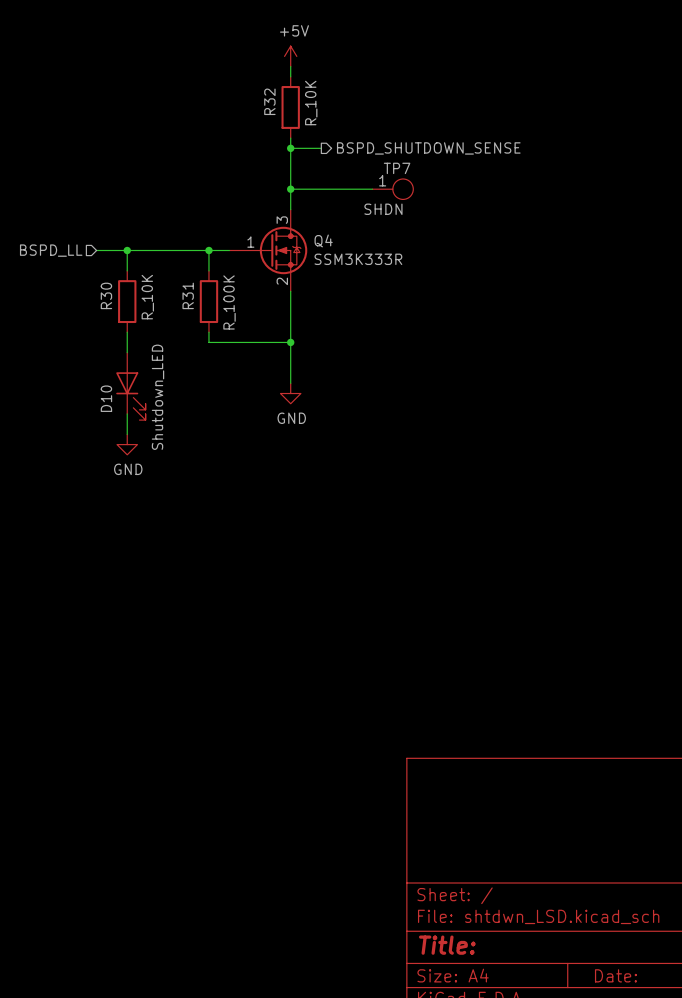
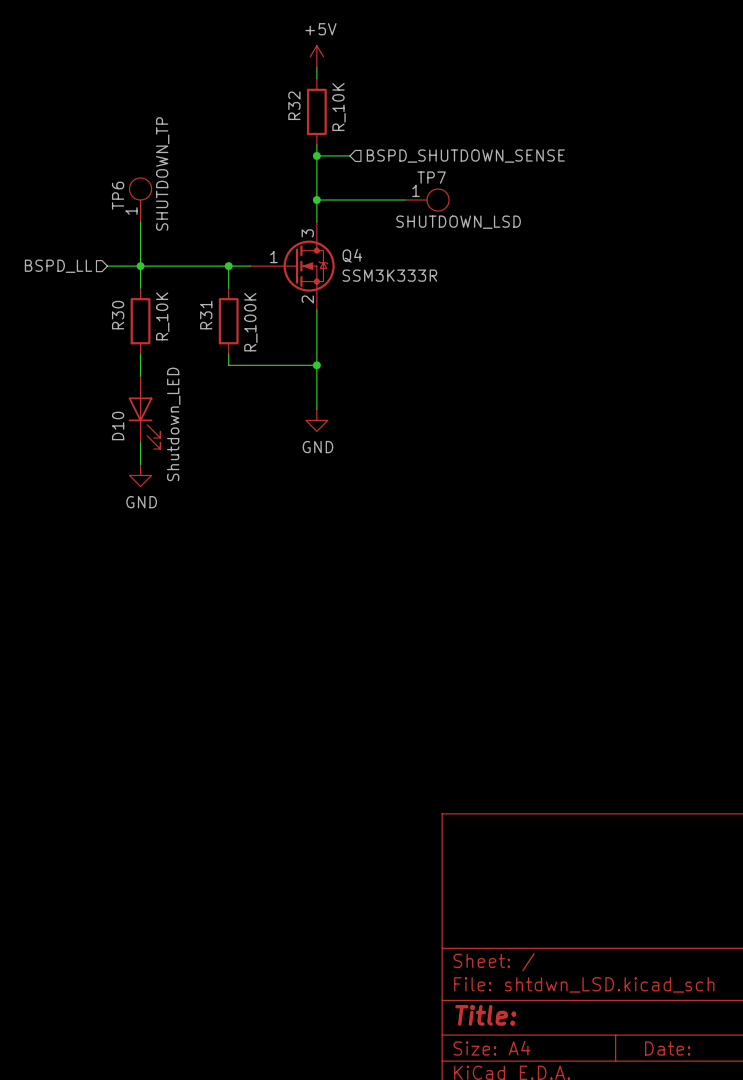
hierarchical label shape: output (428, 148) -> input (465, 156)
TP6: none -> SHUTDOWN_TP (140, 200)
wire: none -> (140, 222) (140, 266)
TP7 value: SHDN (383, 209) -> SHUTDOWN_LSD (458, 222)

